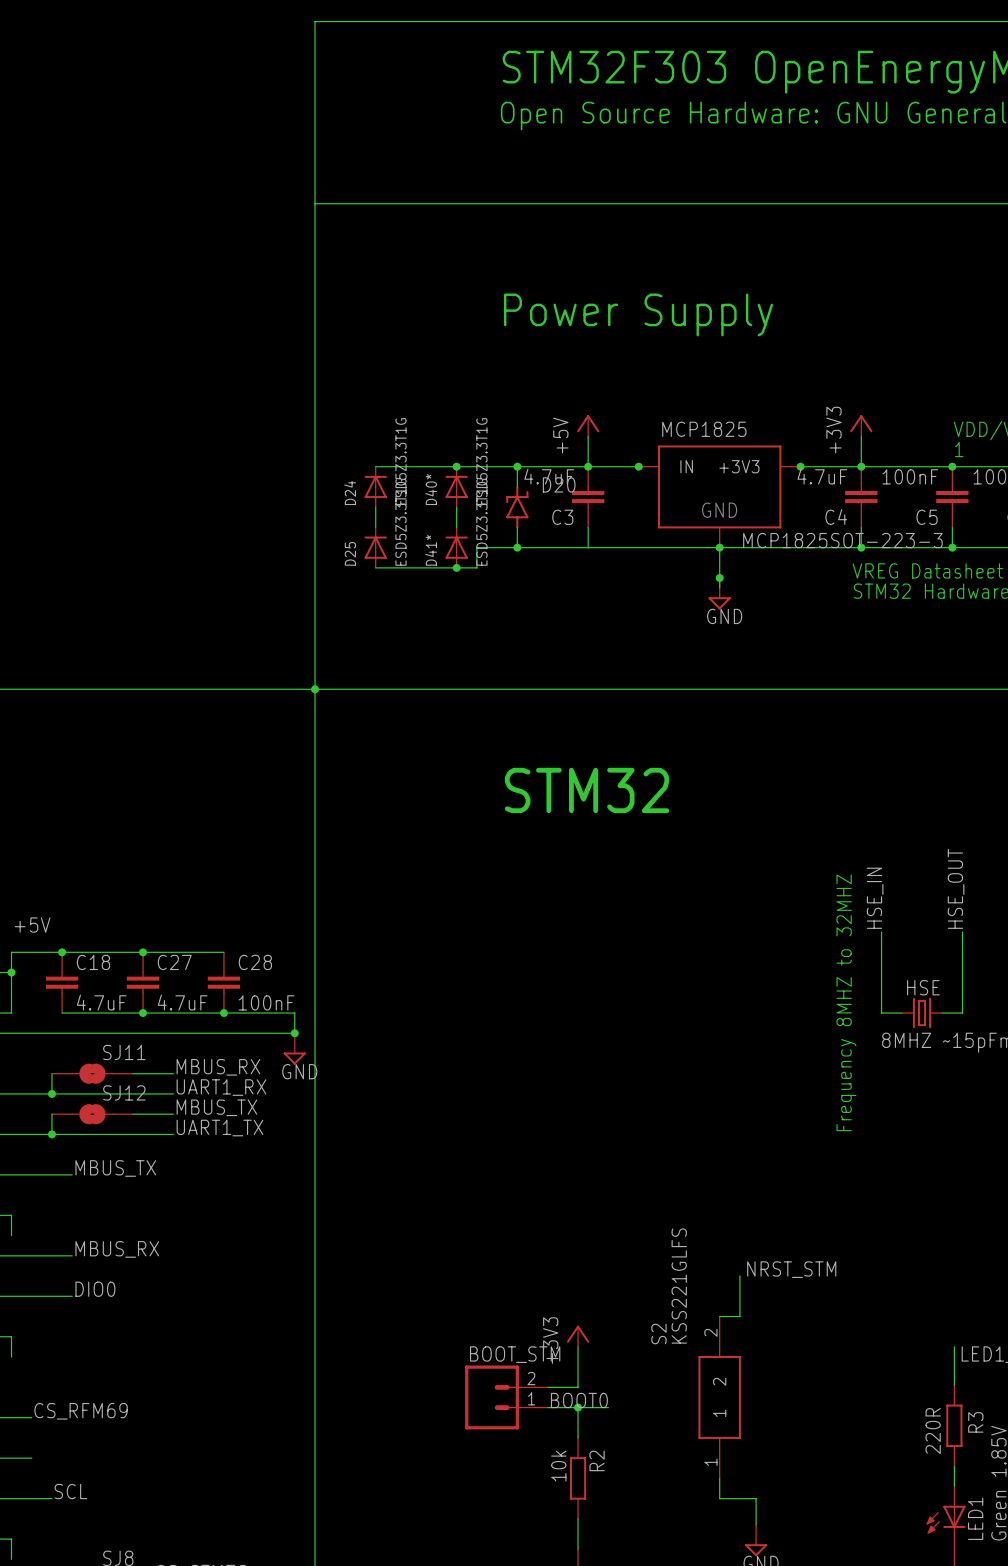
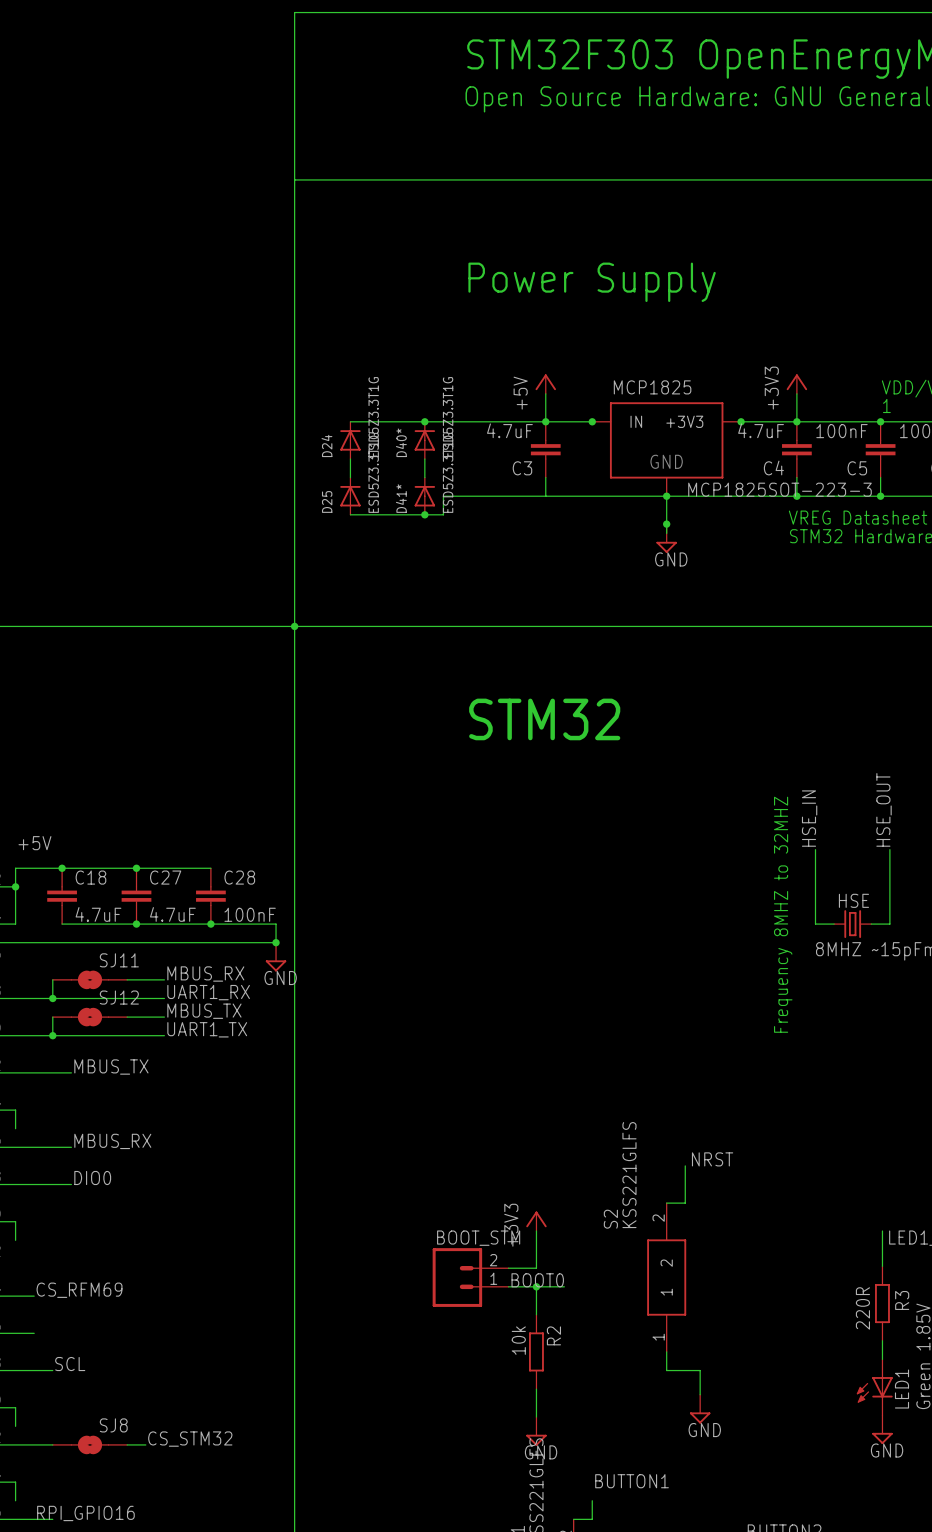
wire: (517, 466) (517, 486) -> none
junction: (517, 466) -> none
D20: (517, 507) -> none
wire: (517, 527) (517, 547) -> none
junction: (517, 547) -> none
label: NRST_STM (791, 1269) -> NRST (712, 1159)

